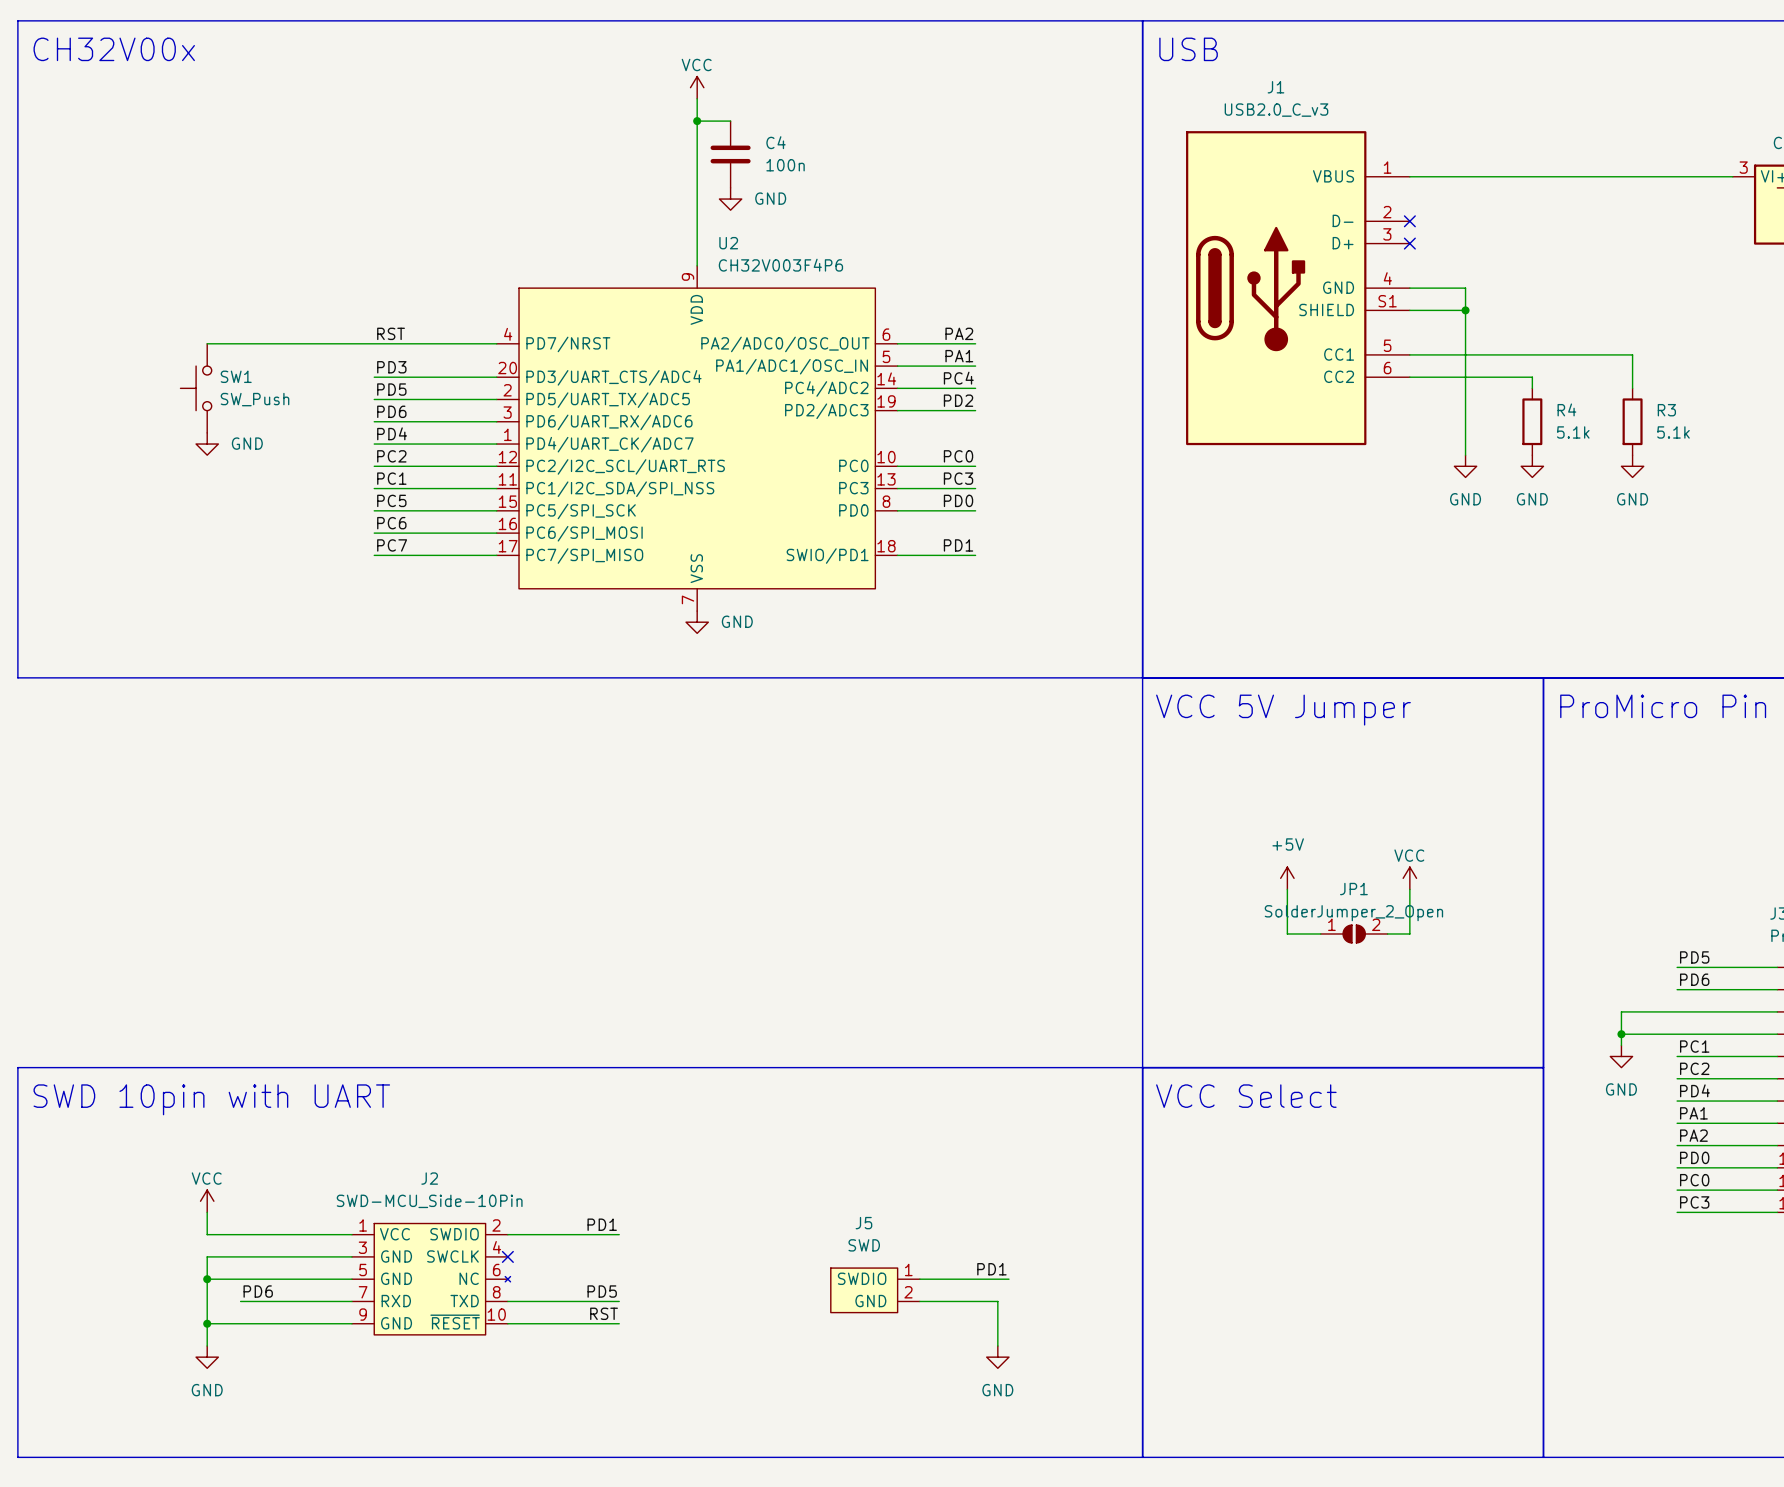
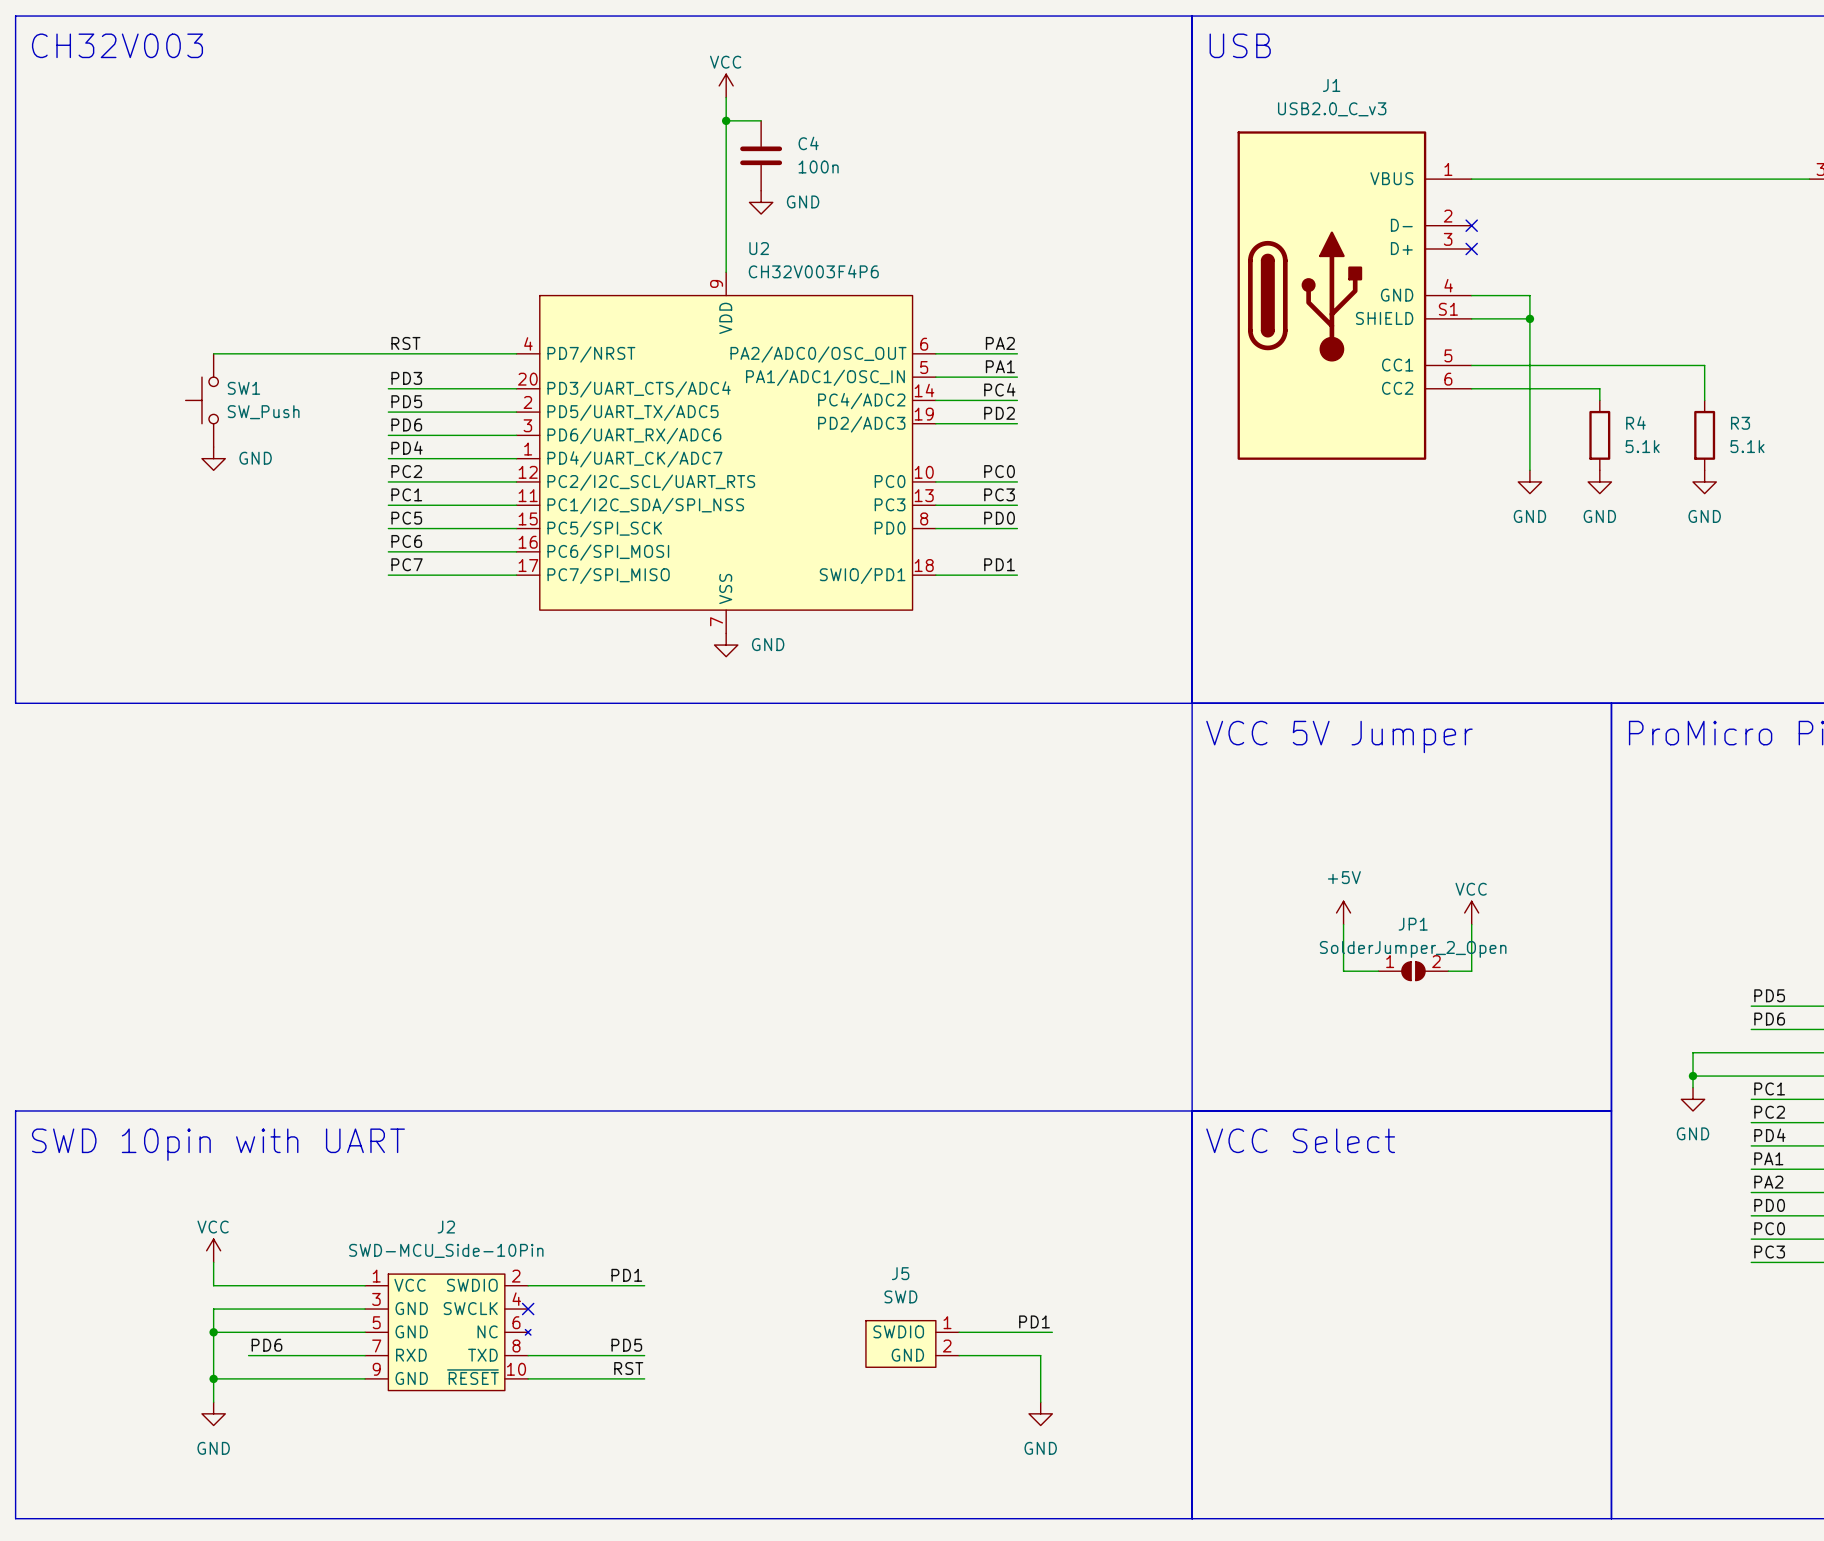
text: CH32V00x (114, 49) -> CH32V003 (117, 45)

